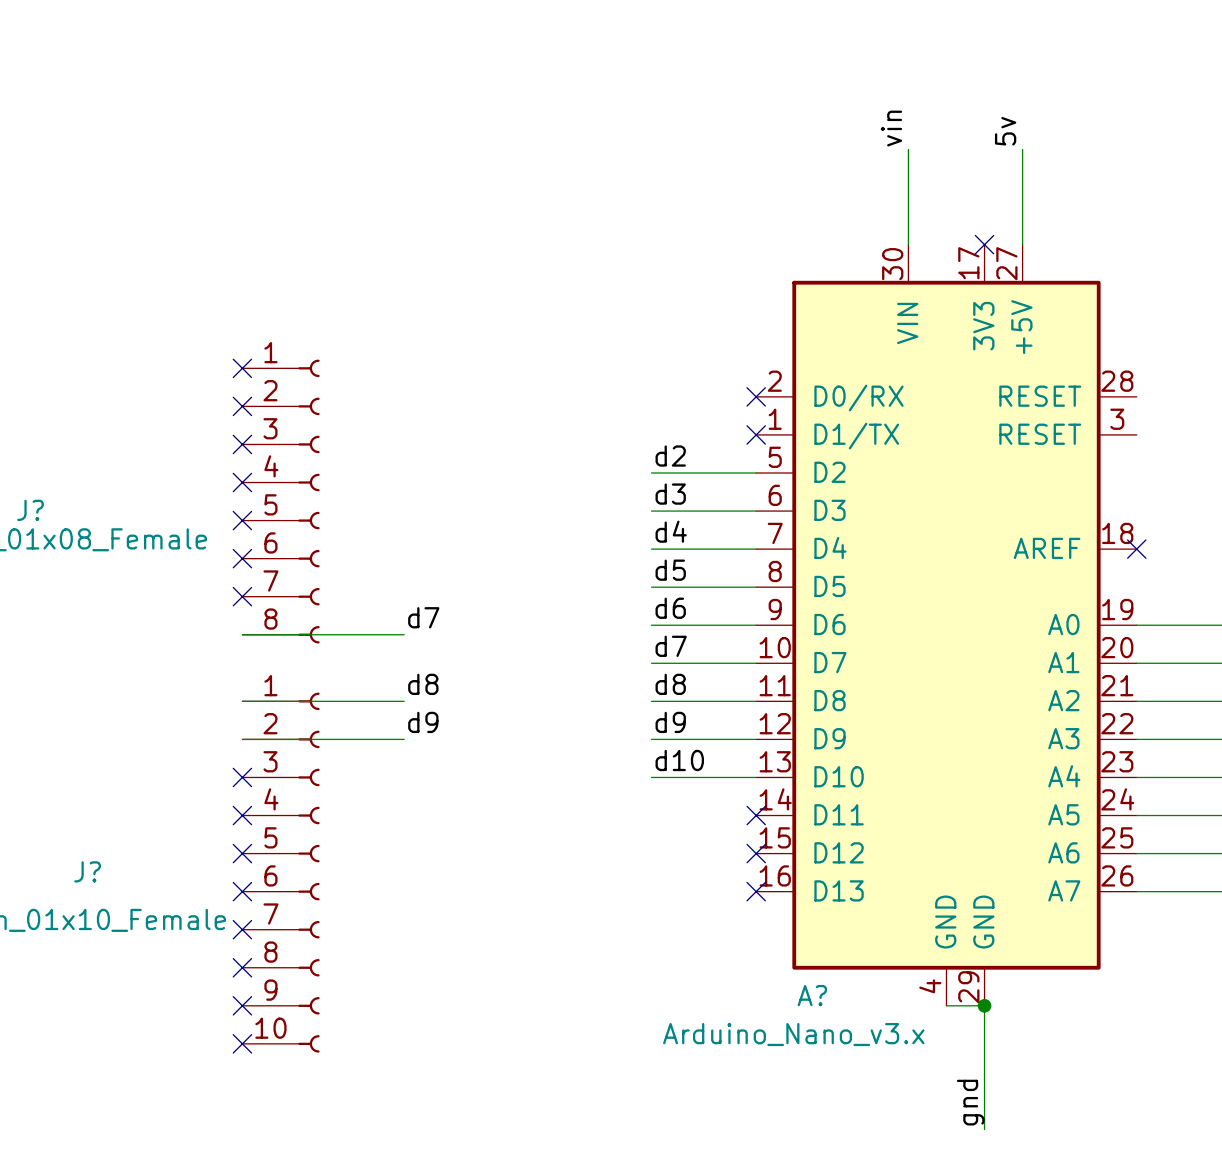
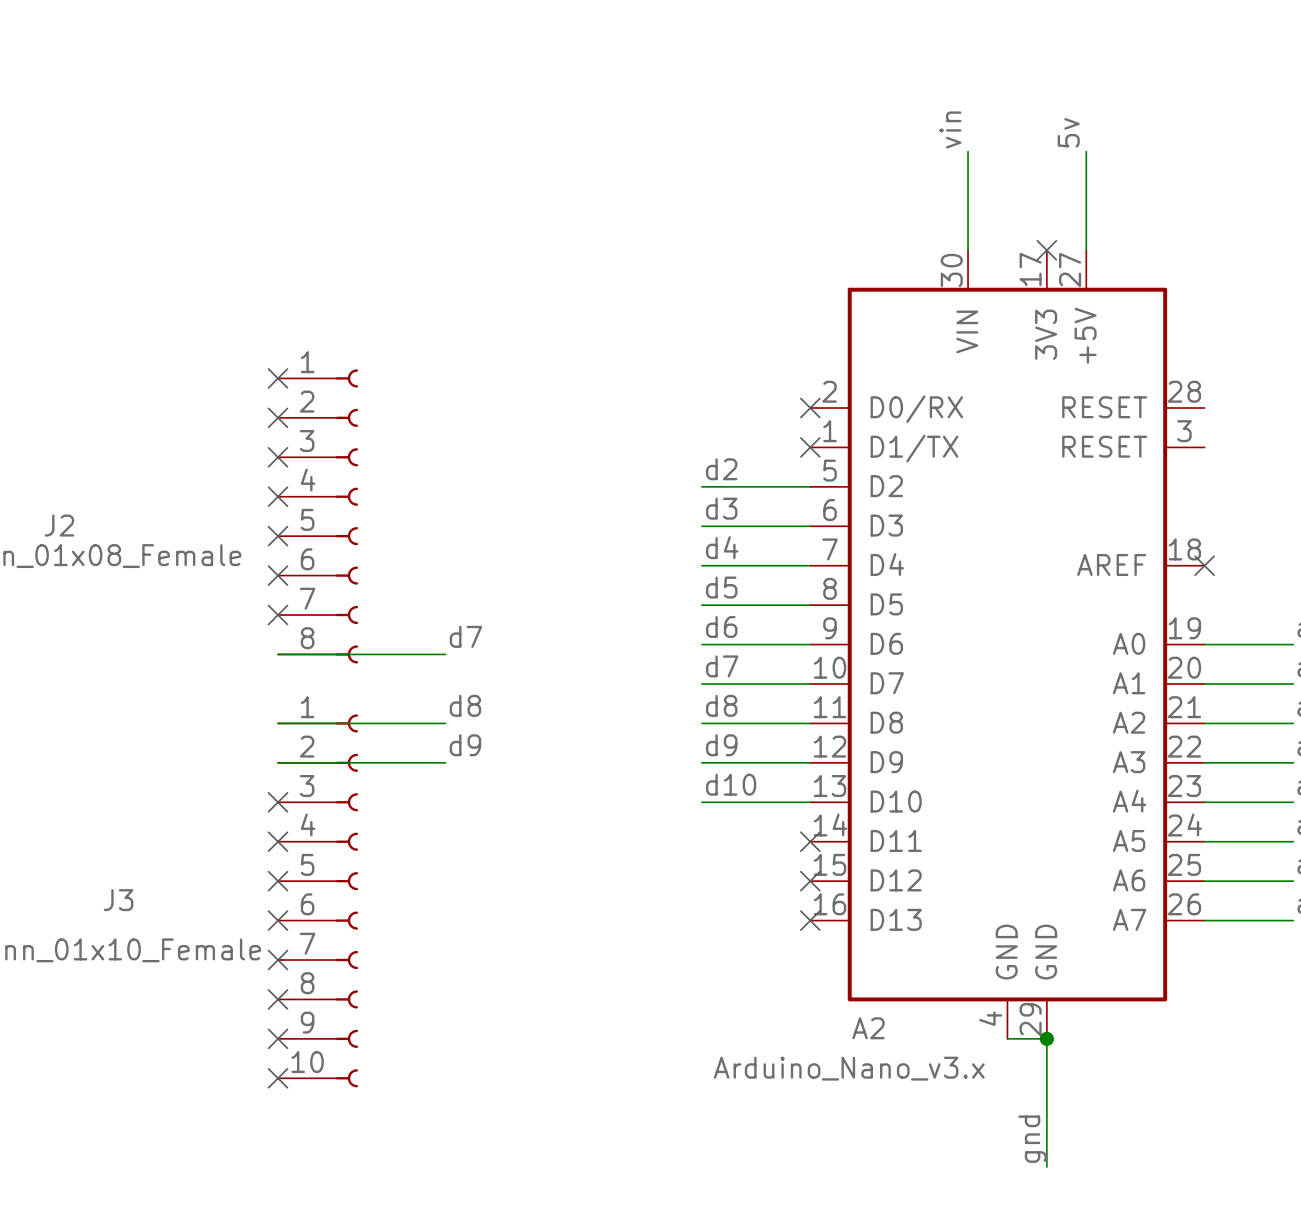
J? name: J? (30, 510) -> J2 (59, 525)
J? name: J? (87, 871) -> J3 (118, 900)
A? name: A? (812, 995) -> A2 (868, 1028)

